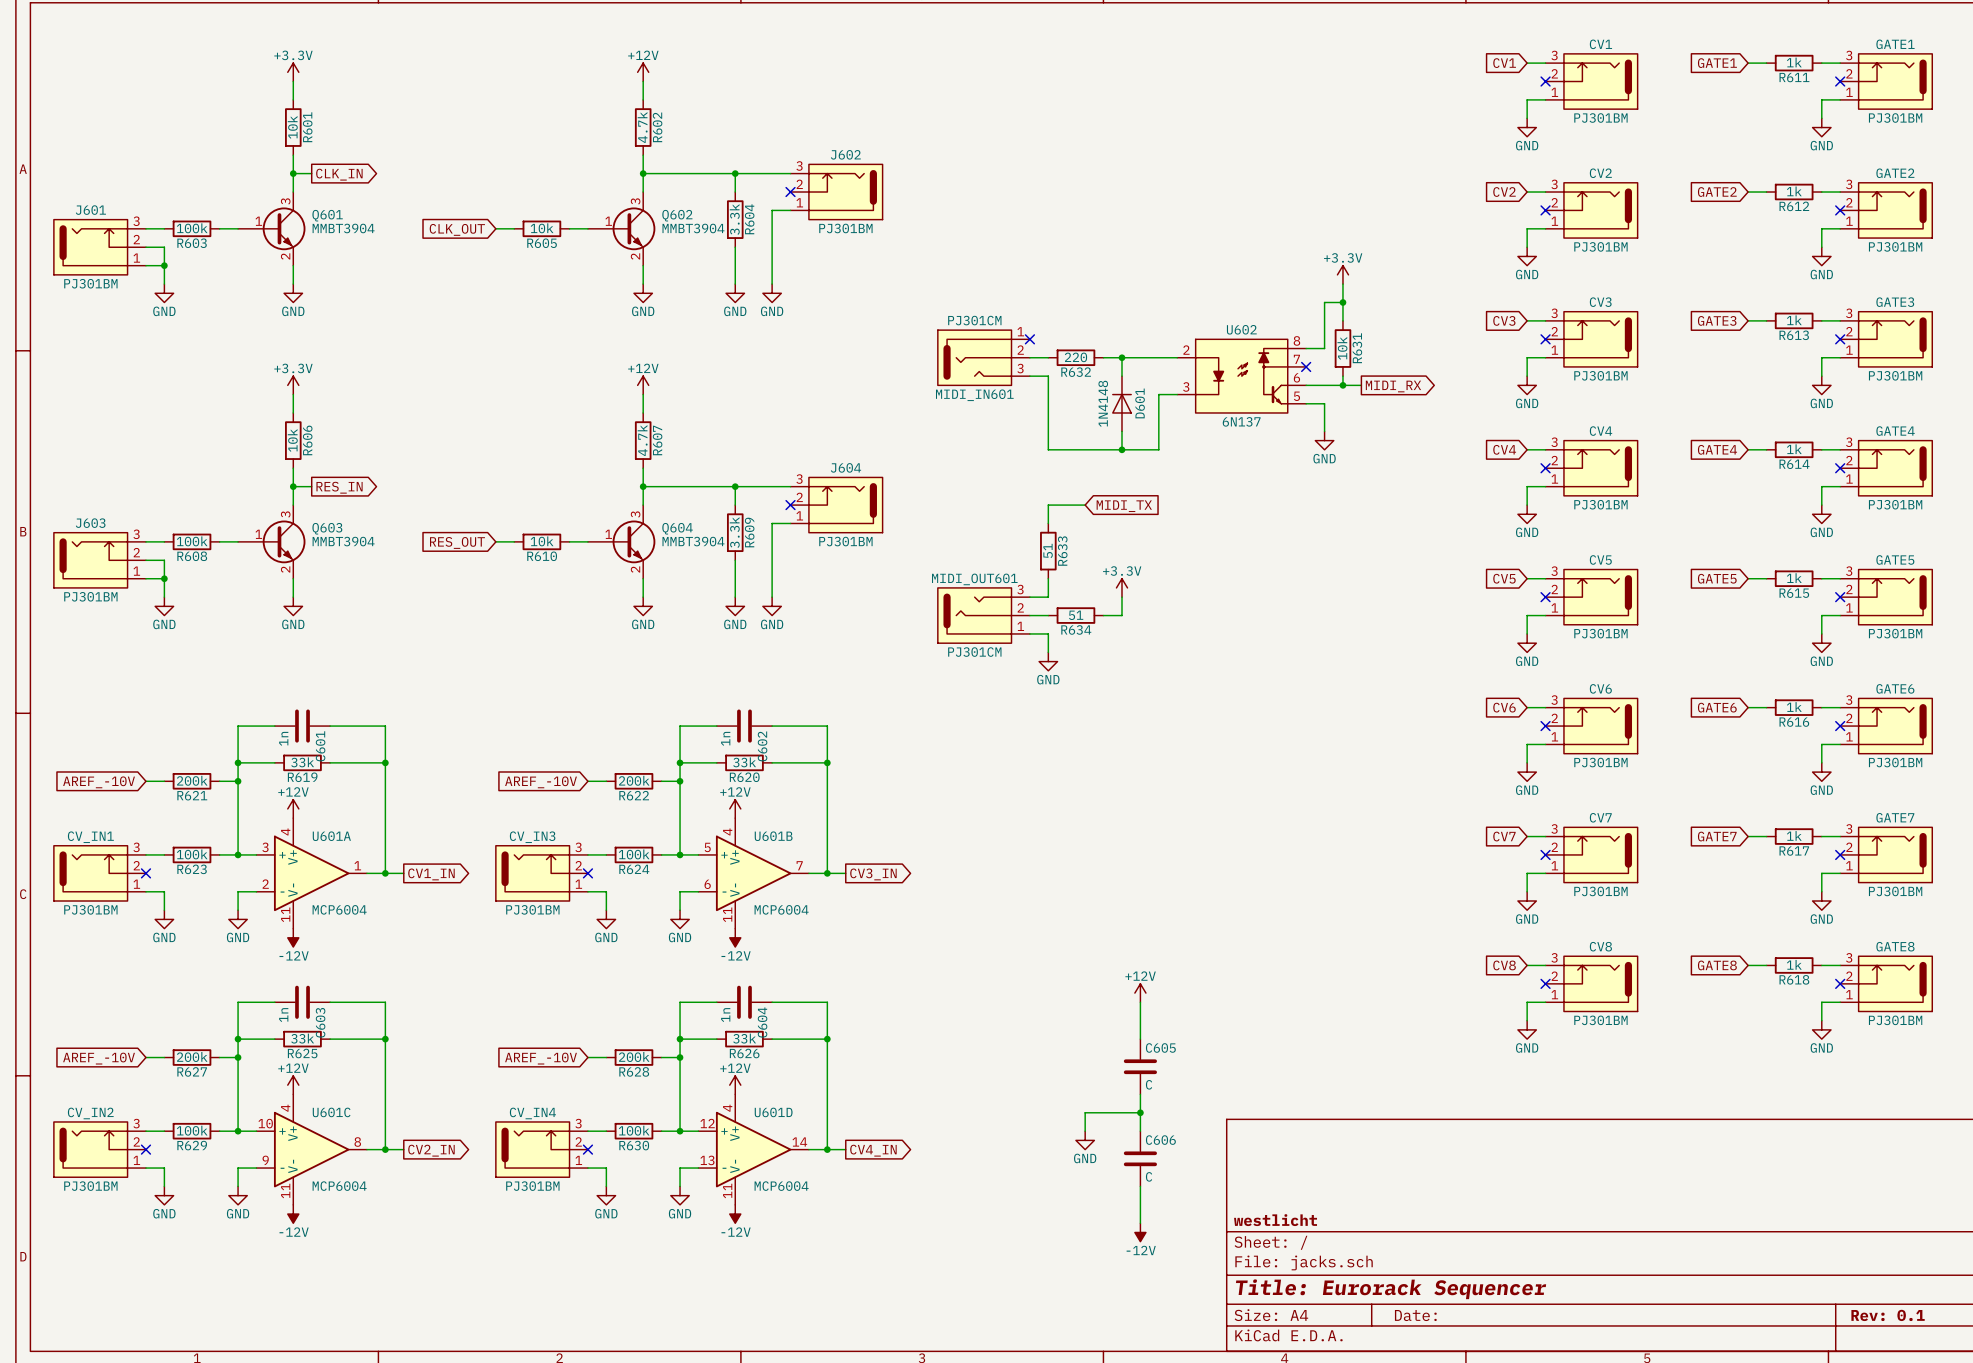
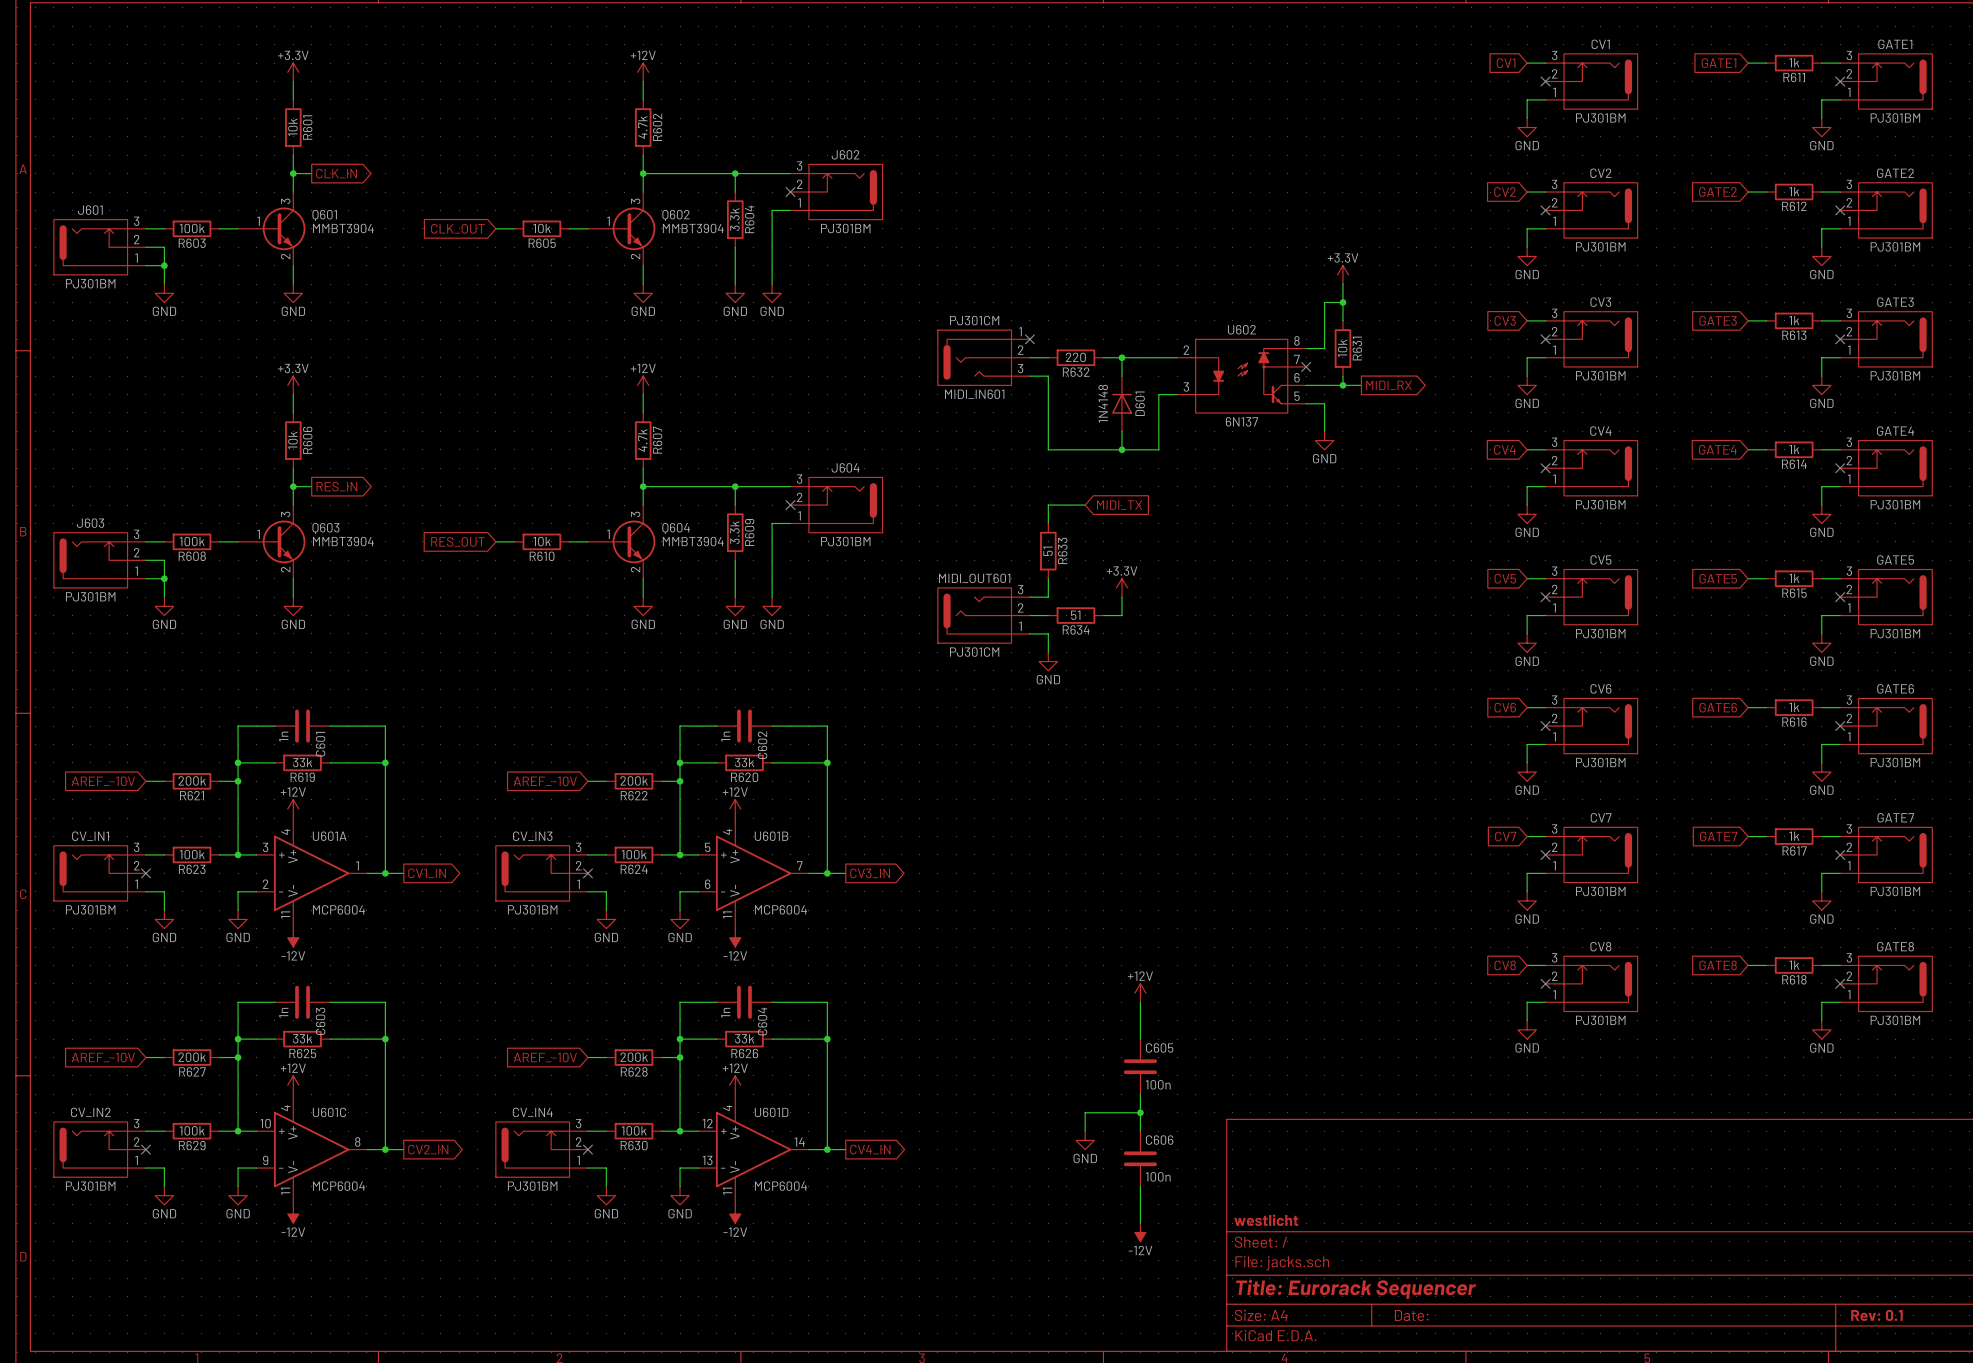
C605 value: C (1149, 1084) -> 100n (1158, 1084)
C606 value: C (1149, 1176) -> 100n (1158, 1176)

